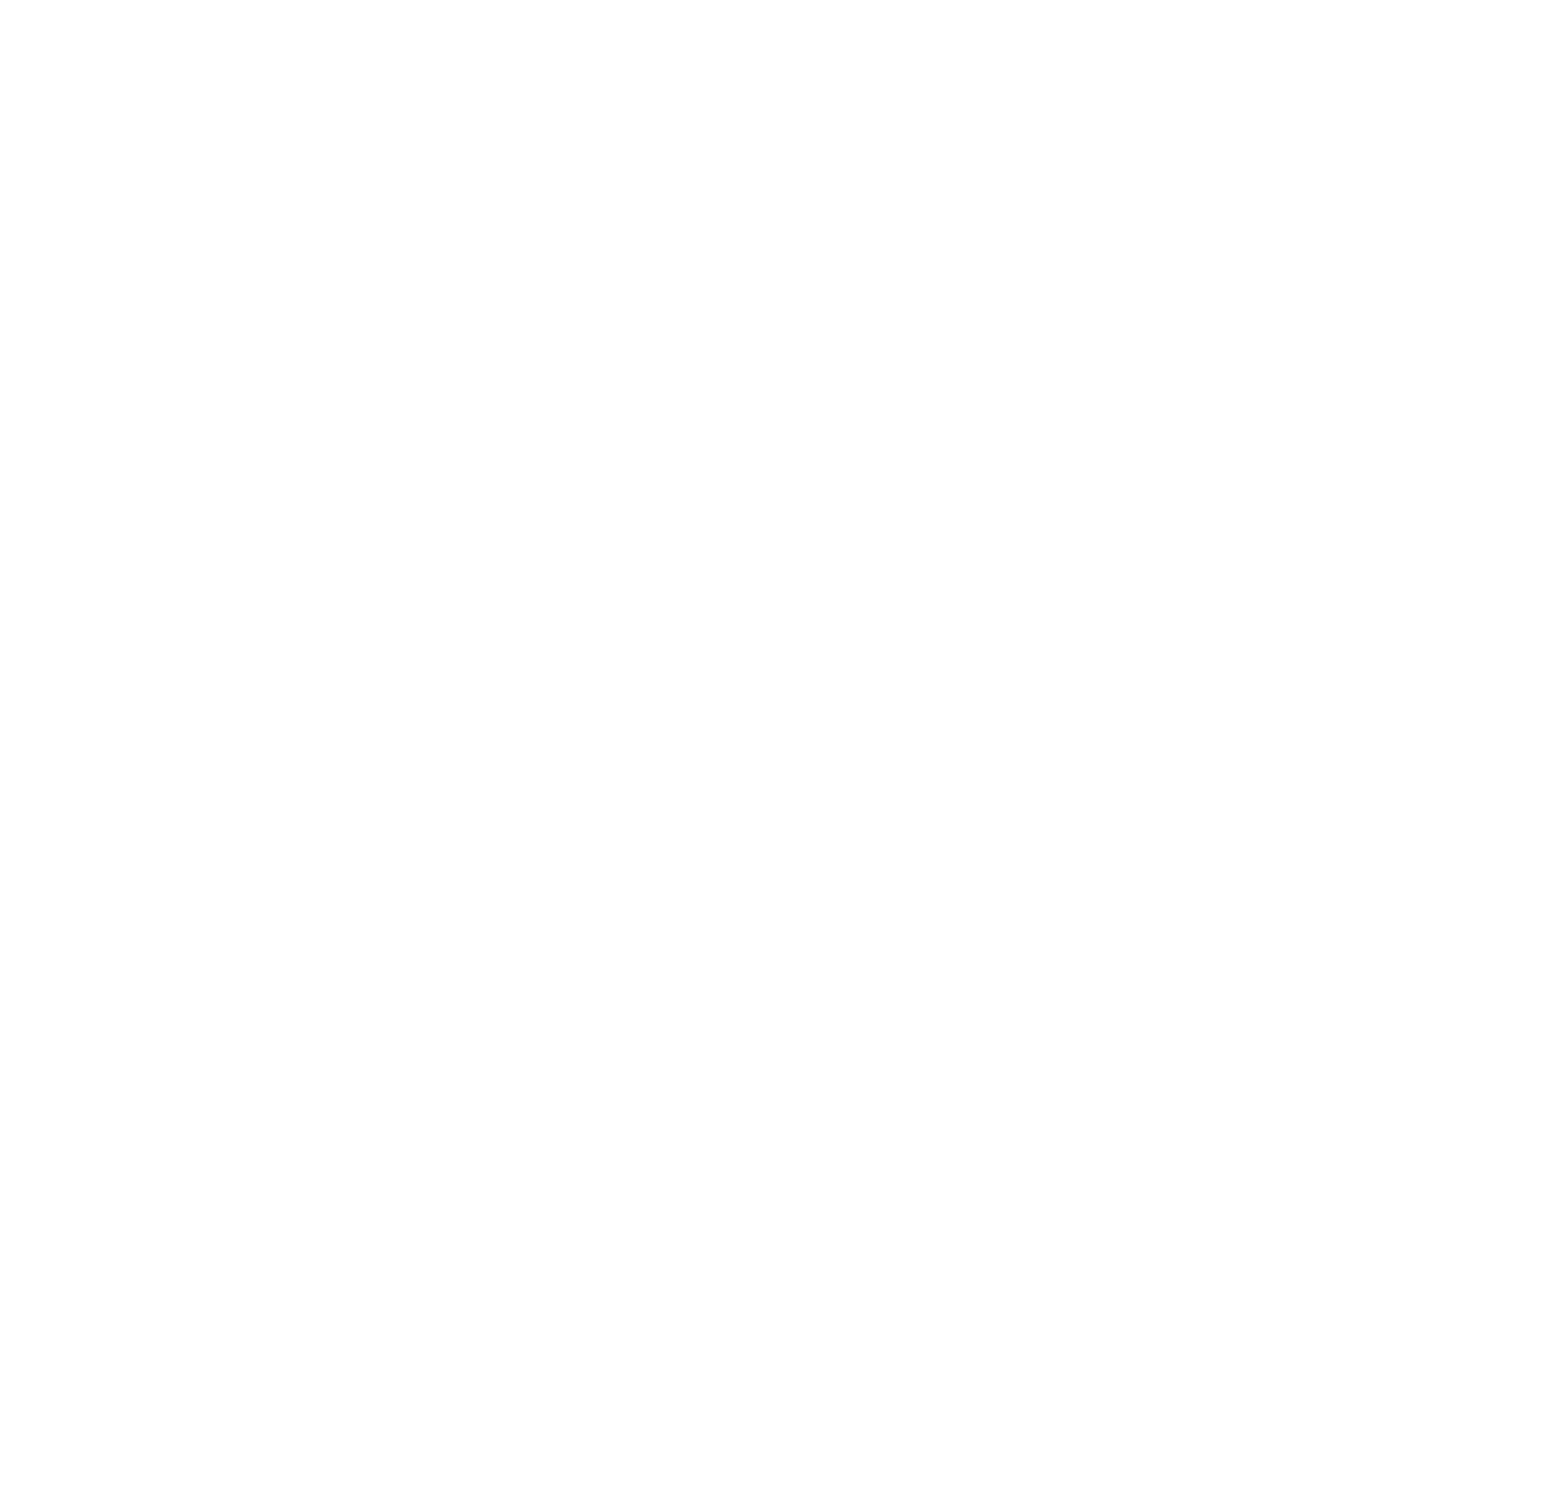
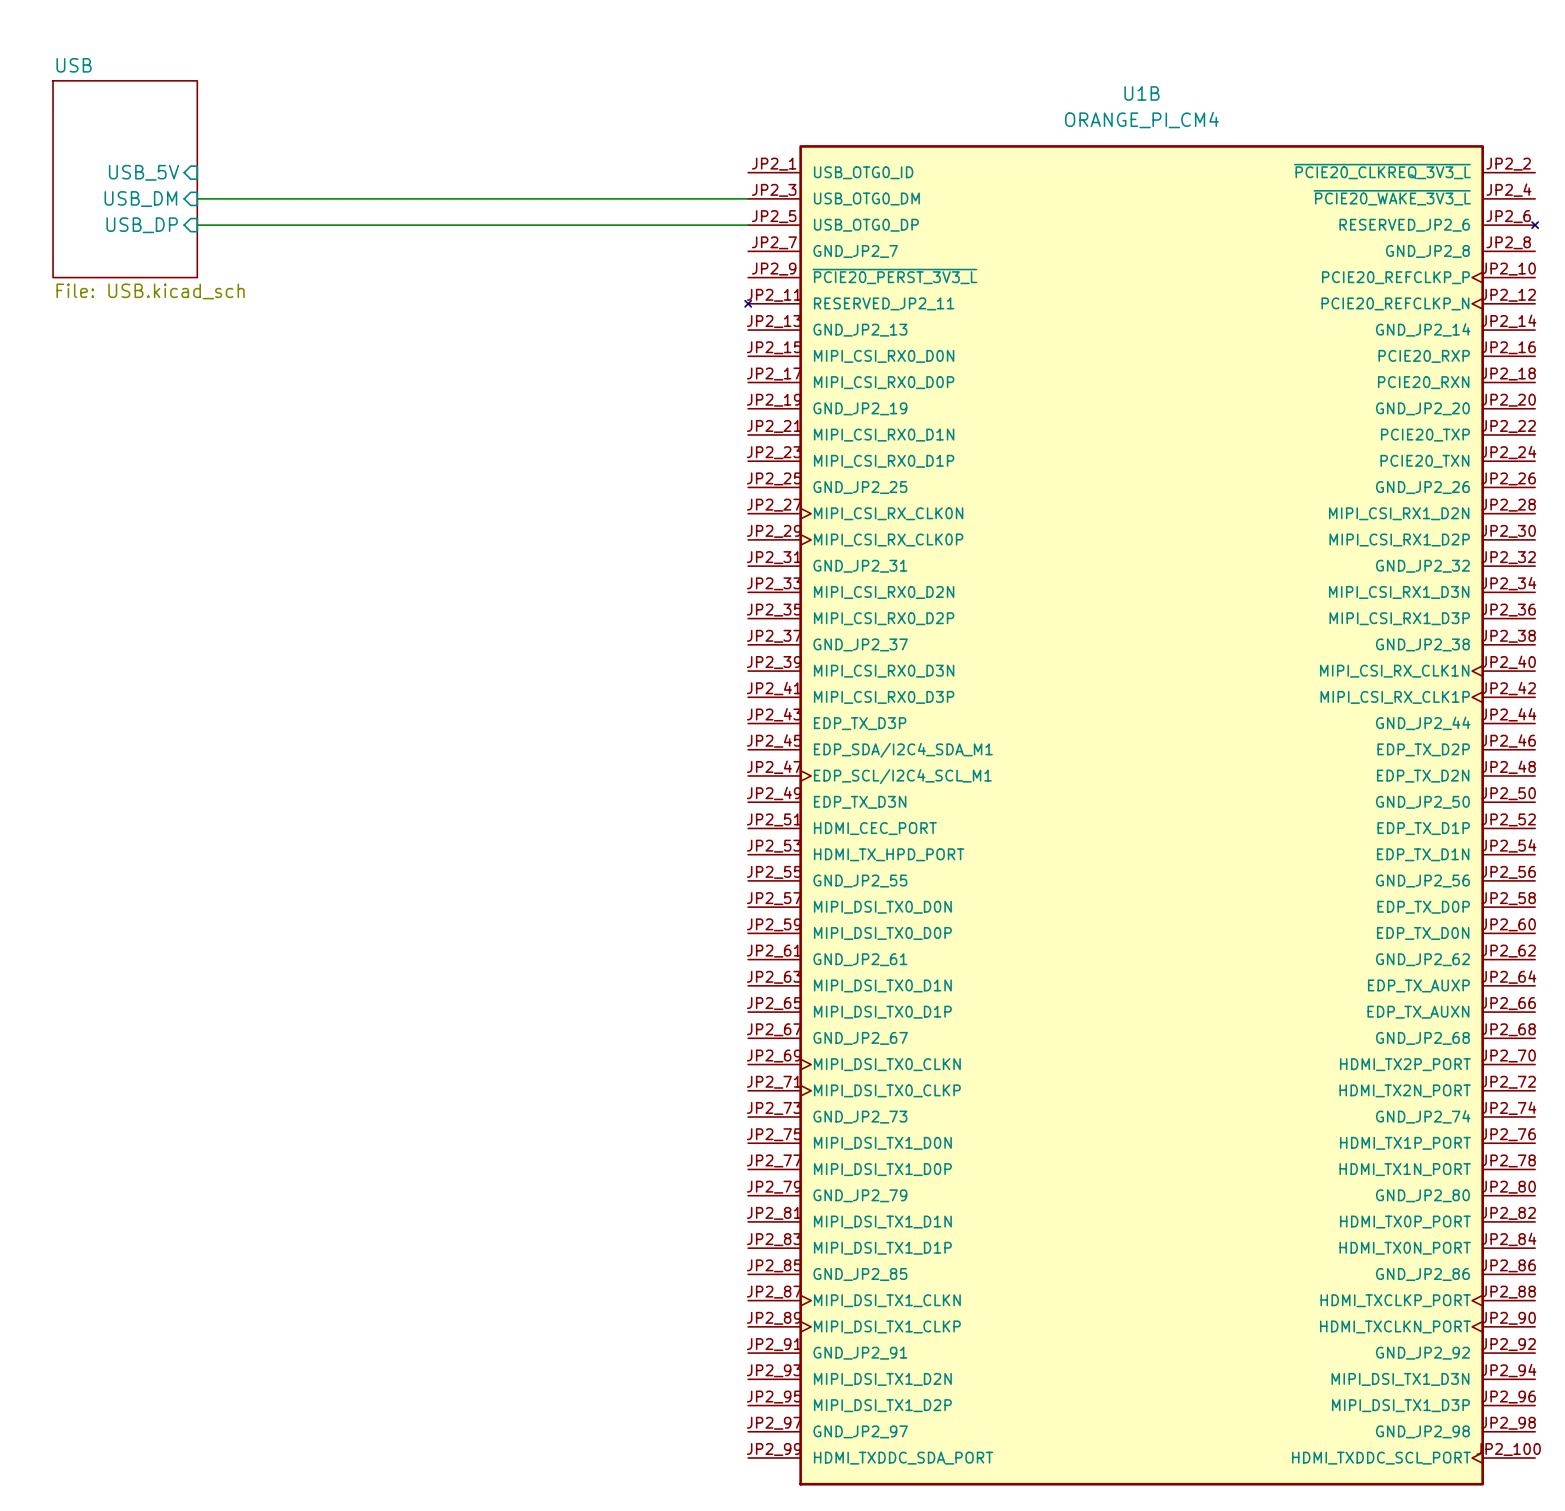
sheet pin: none -> USB_5V (144, 172)
sheet USB: none -> File: USB.kicad_sch (125, 179)
wire: none -> (197, 198) (748, 198)
sheet pin: none -> USB_DM (140, 199)
sheet pin: none -> USB_DP (142, 225)
wire: none -> (197, 225) (748, 225)
U1B: none -> ORANGE_PI_CM4 (1141, 815)

